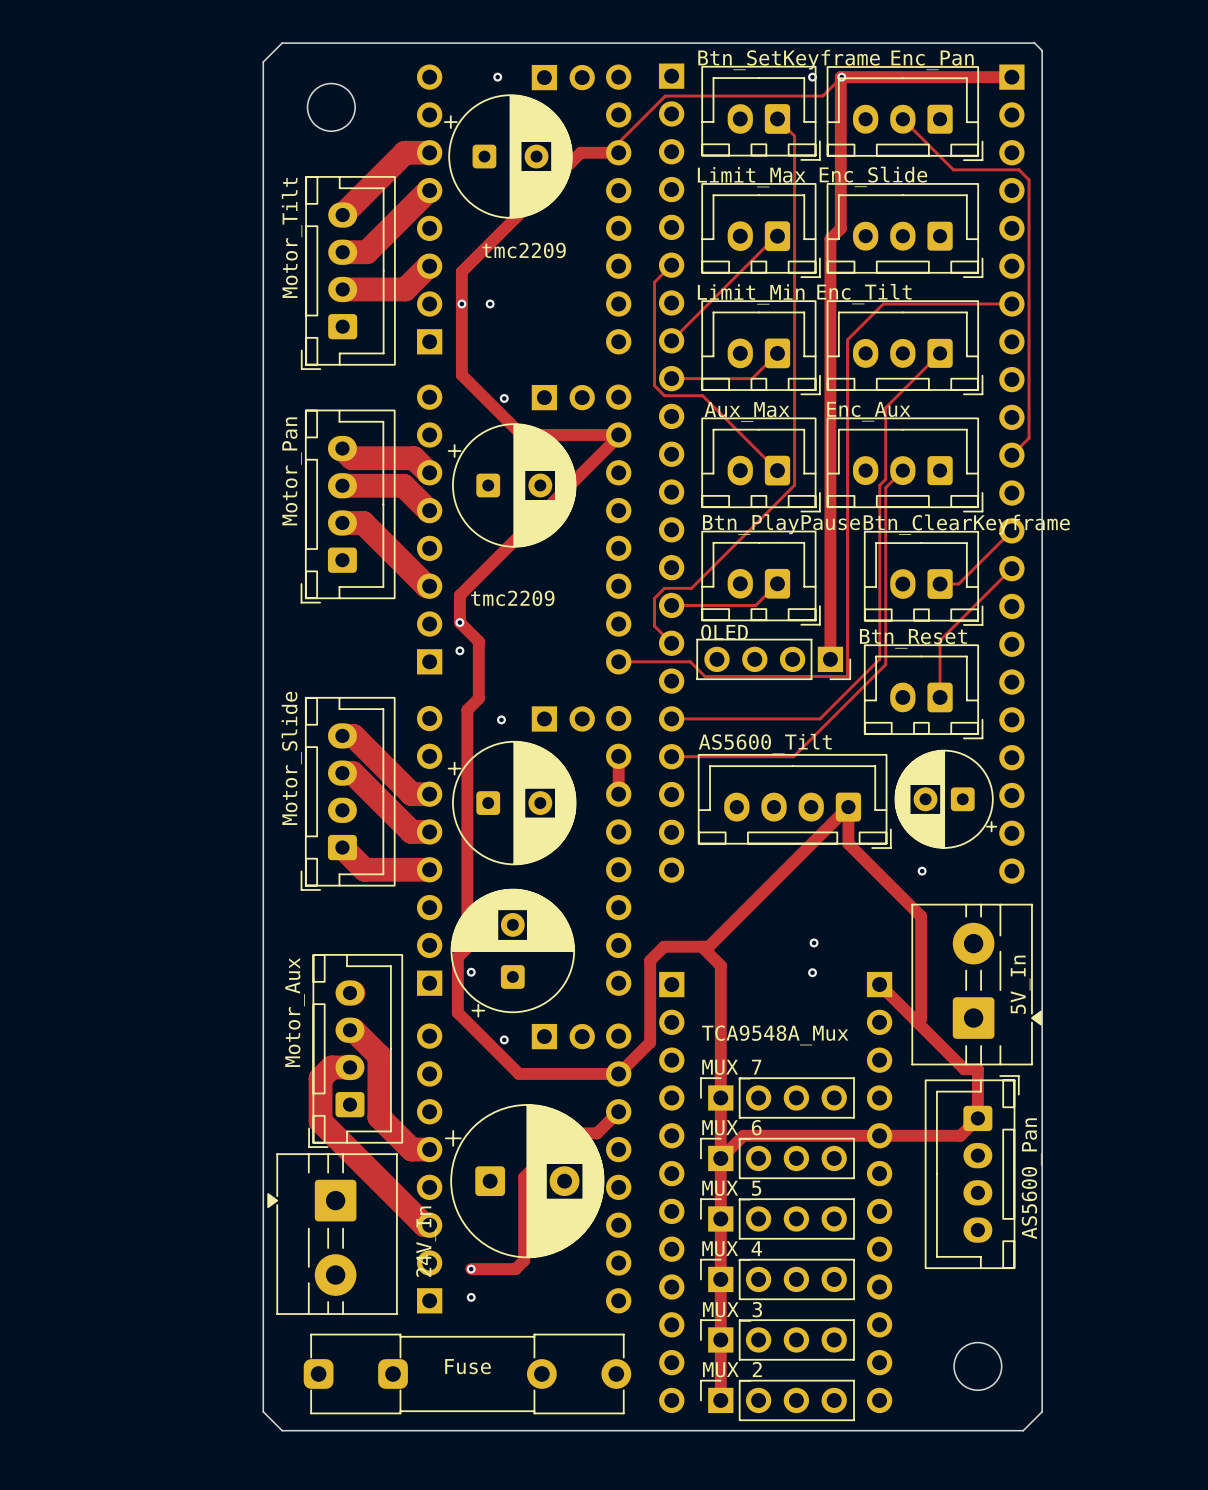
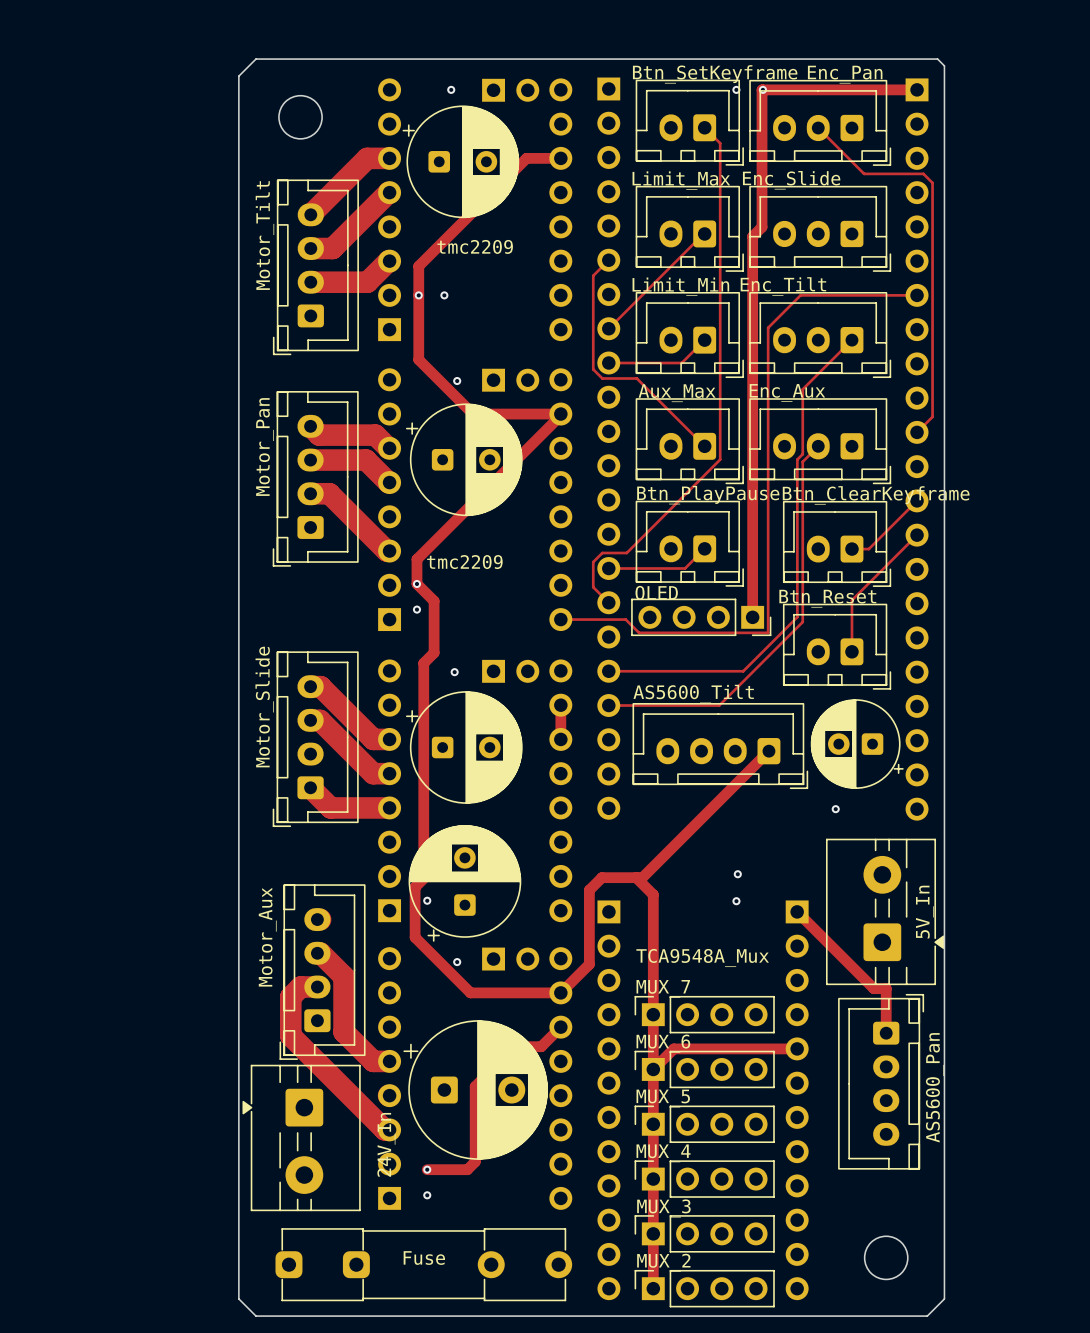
track: (841, 77) (822, 96) (665, 96) (618, 142) (618, 152) -> none
track: (848, 807) (848, 843) (921, 916) (921, 1018) (917, 1022) -> none
track: (977, 1118) (960, 1135) (879, 1135) -> none

